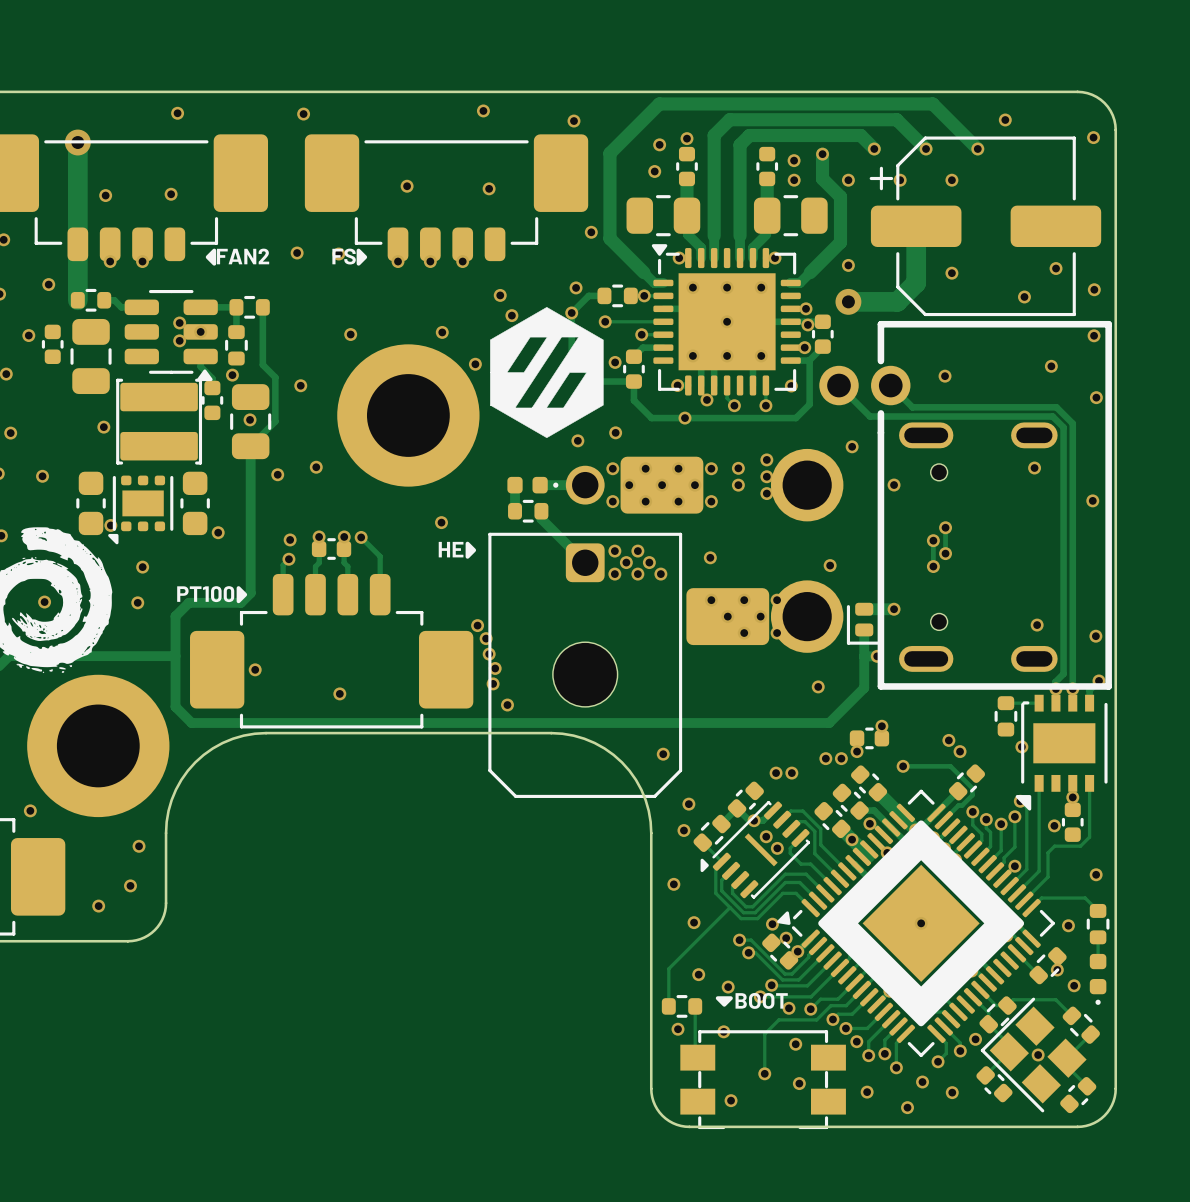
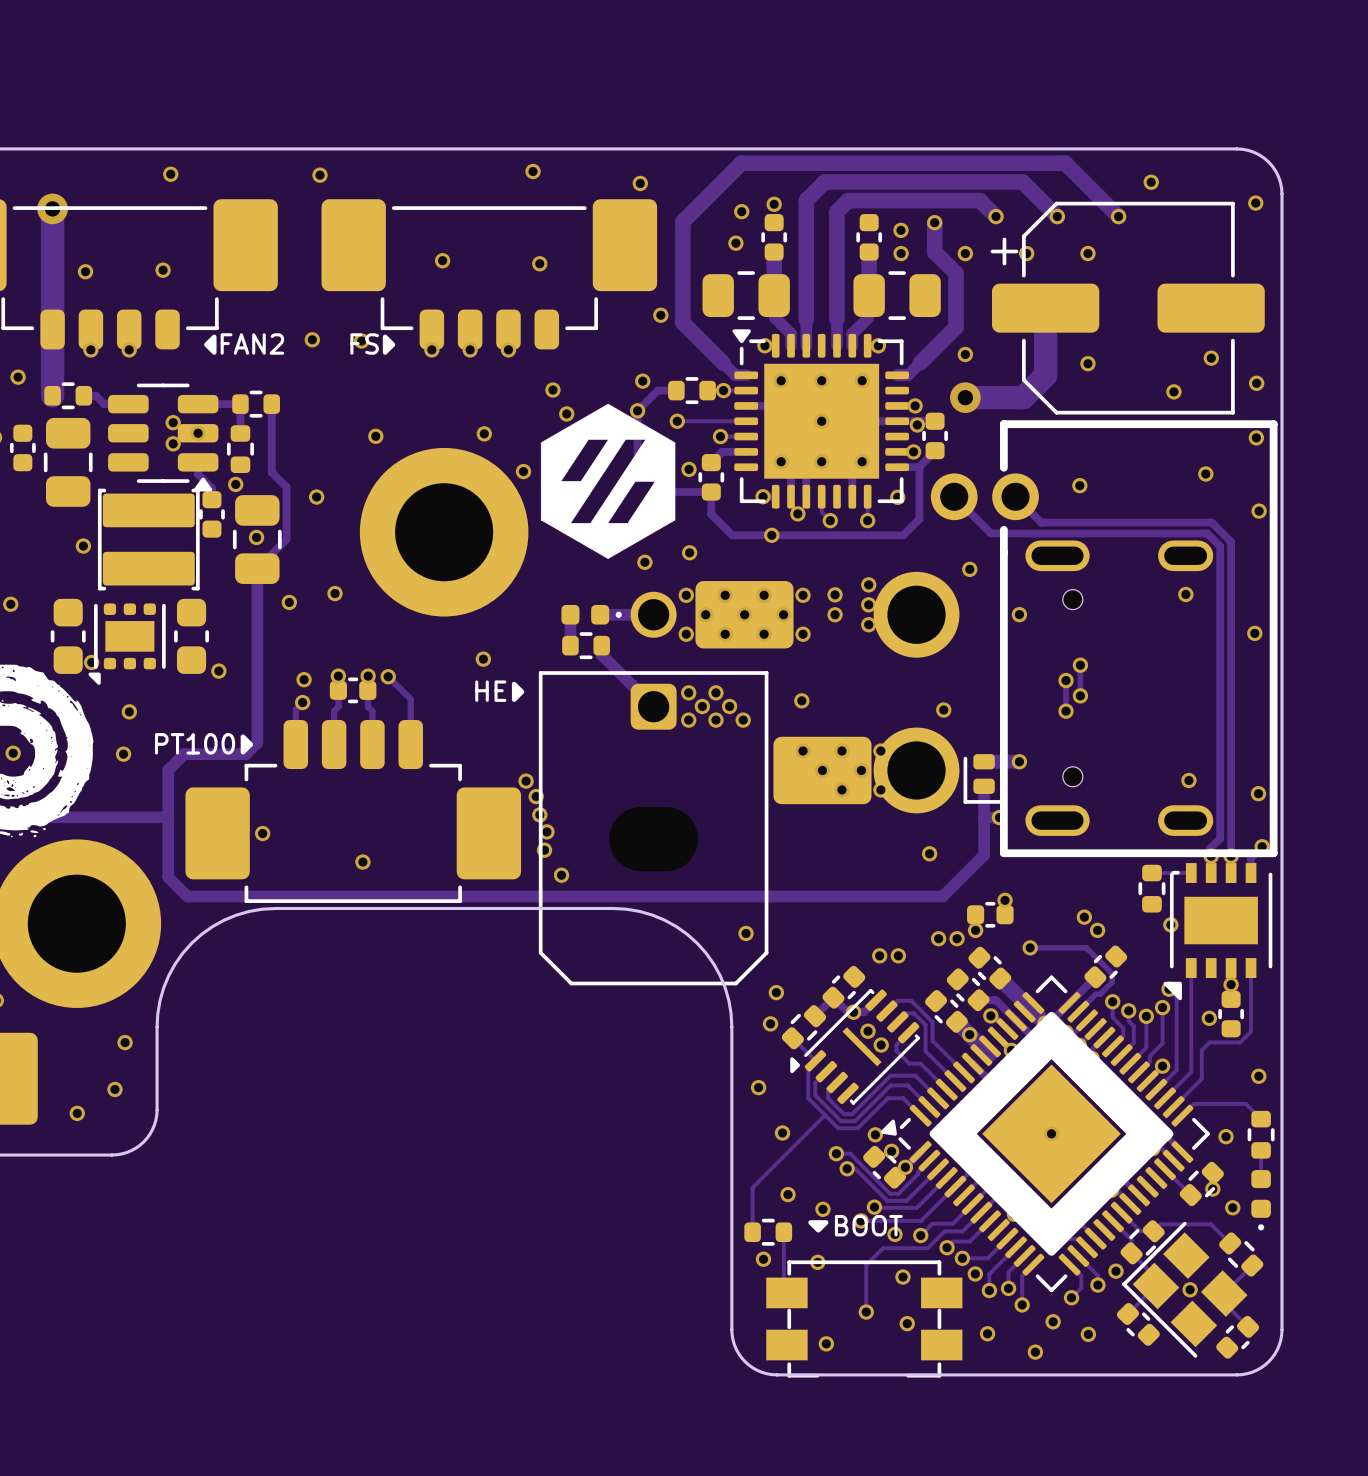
part footprint: [488, 465, 683, 798] -> [538, 591, 769, 986]

